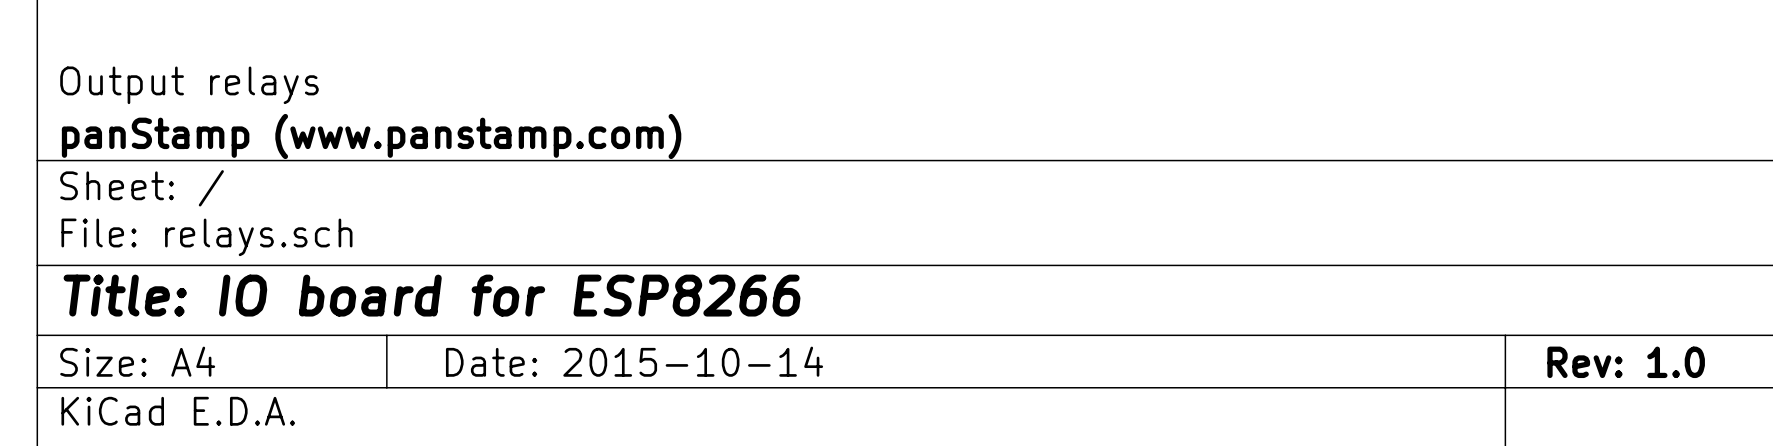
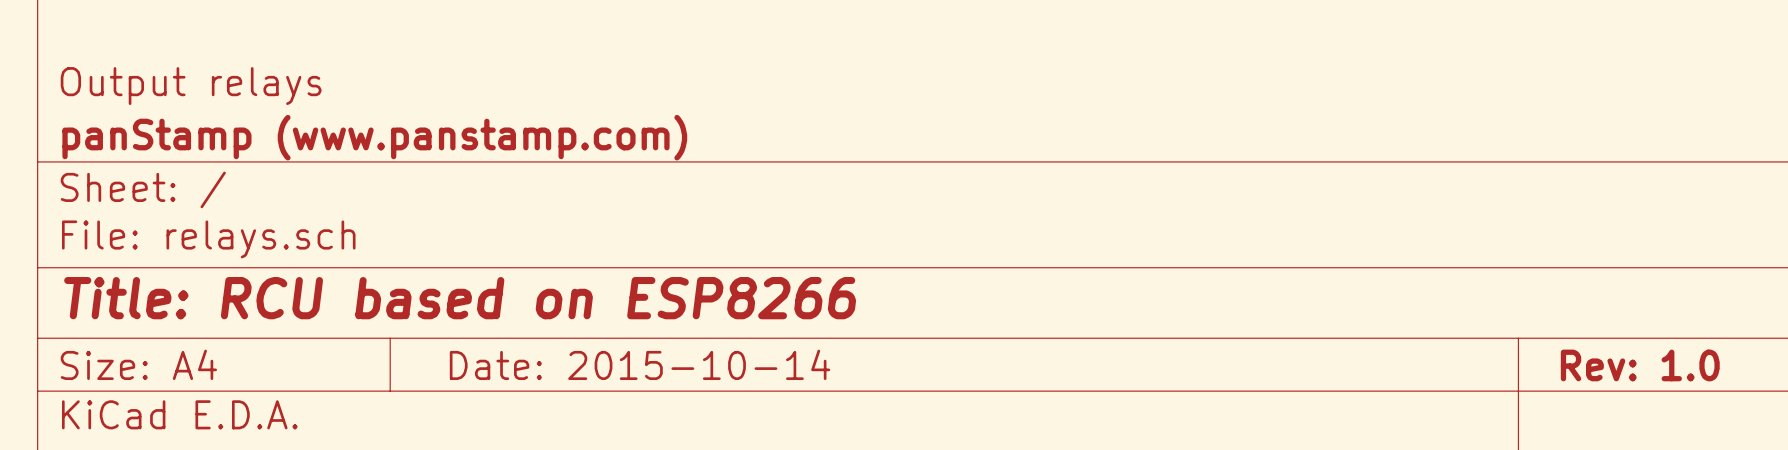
title block: Title: IO board for ESP8266 (432, 295) -> Title: RCU based on ESP8266 (460, 298)

